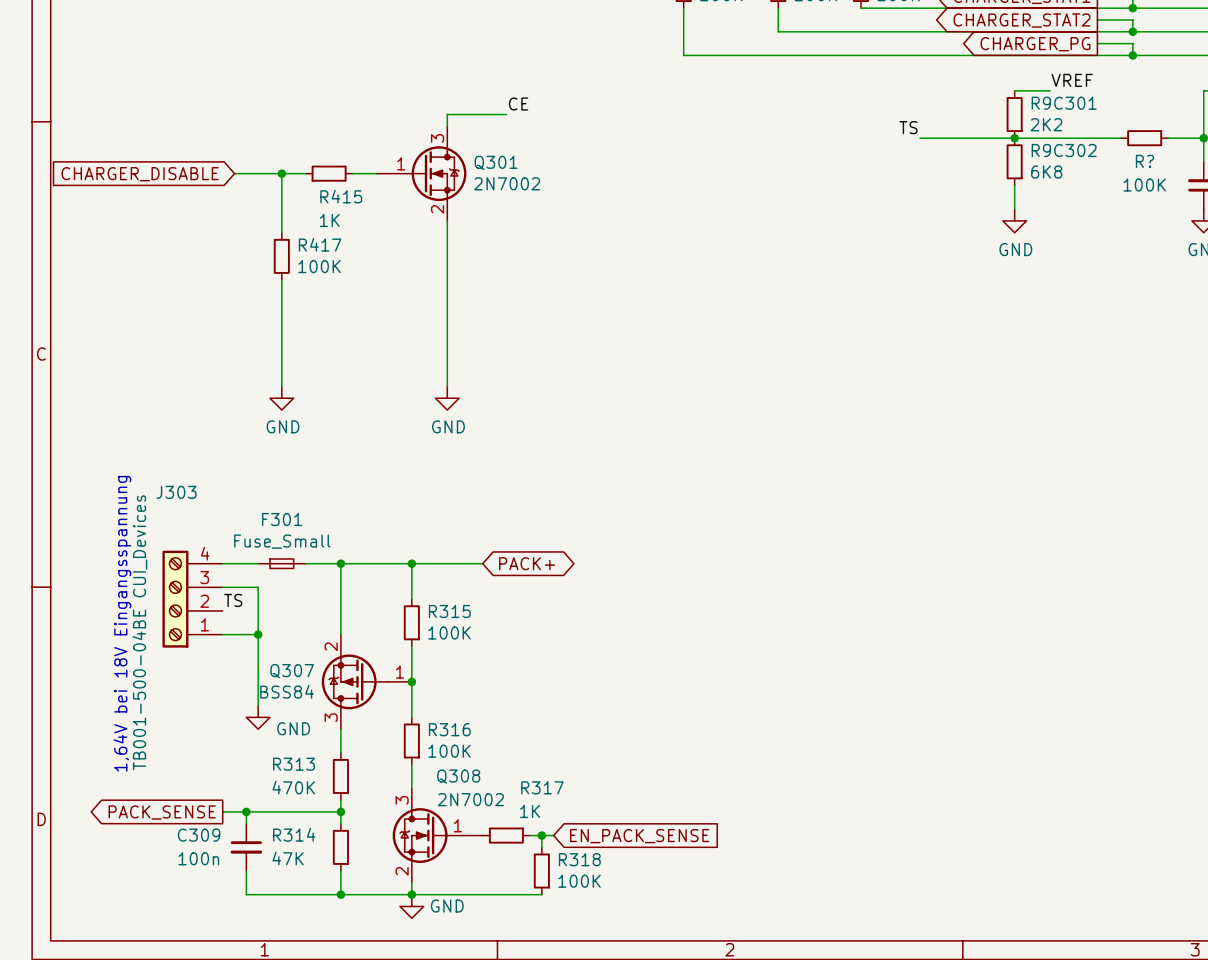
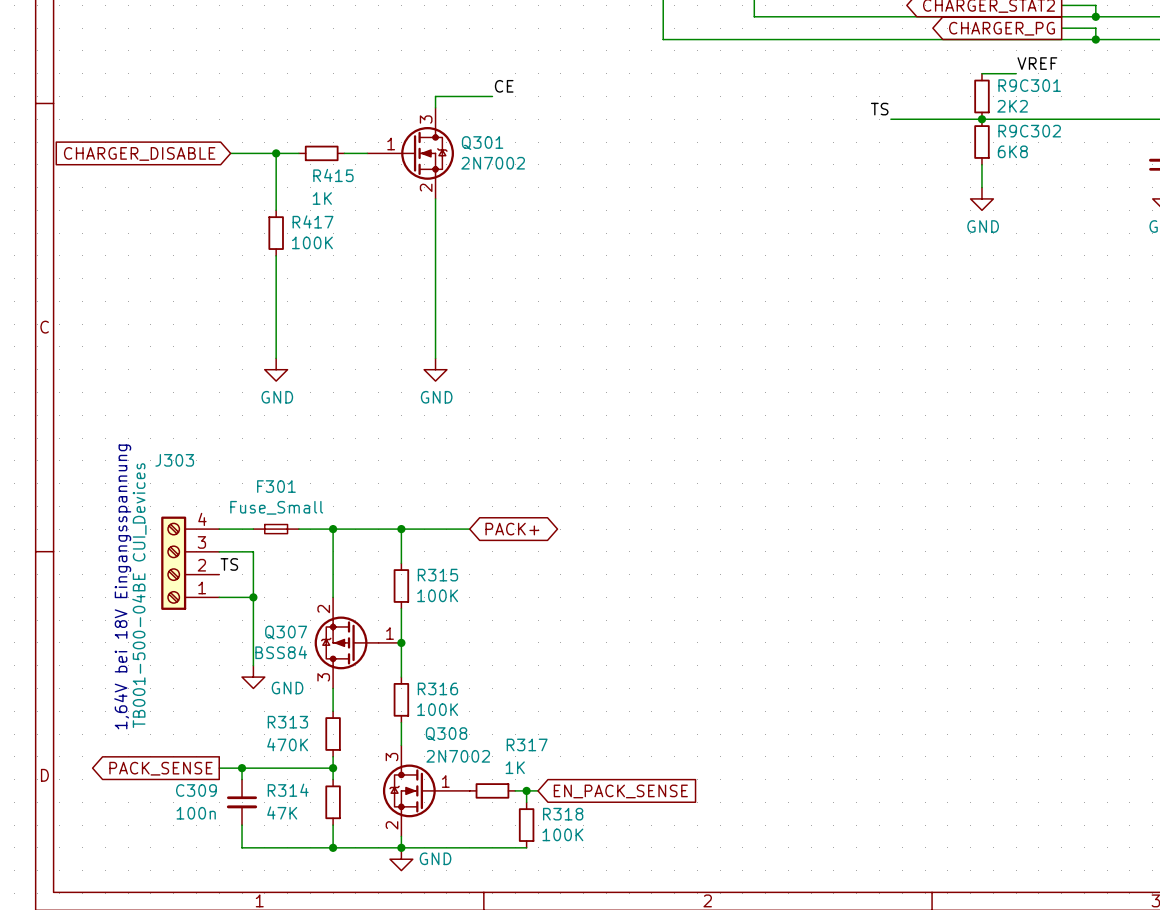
wire: none -> (1084, 119) (1129, 119)
R?: 100K (1144, 138) -> none

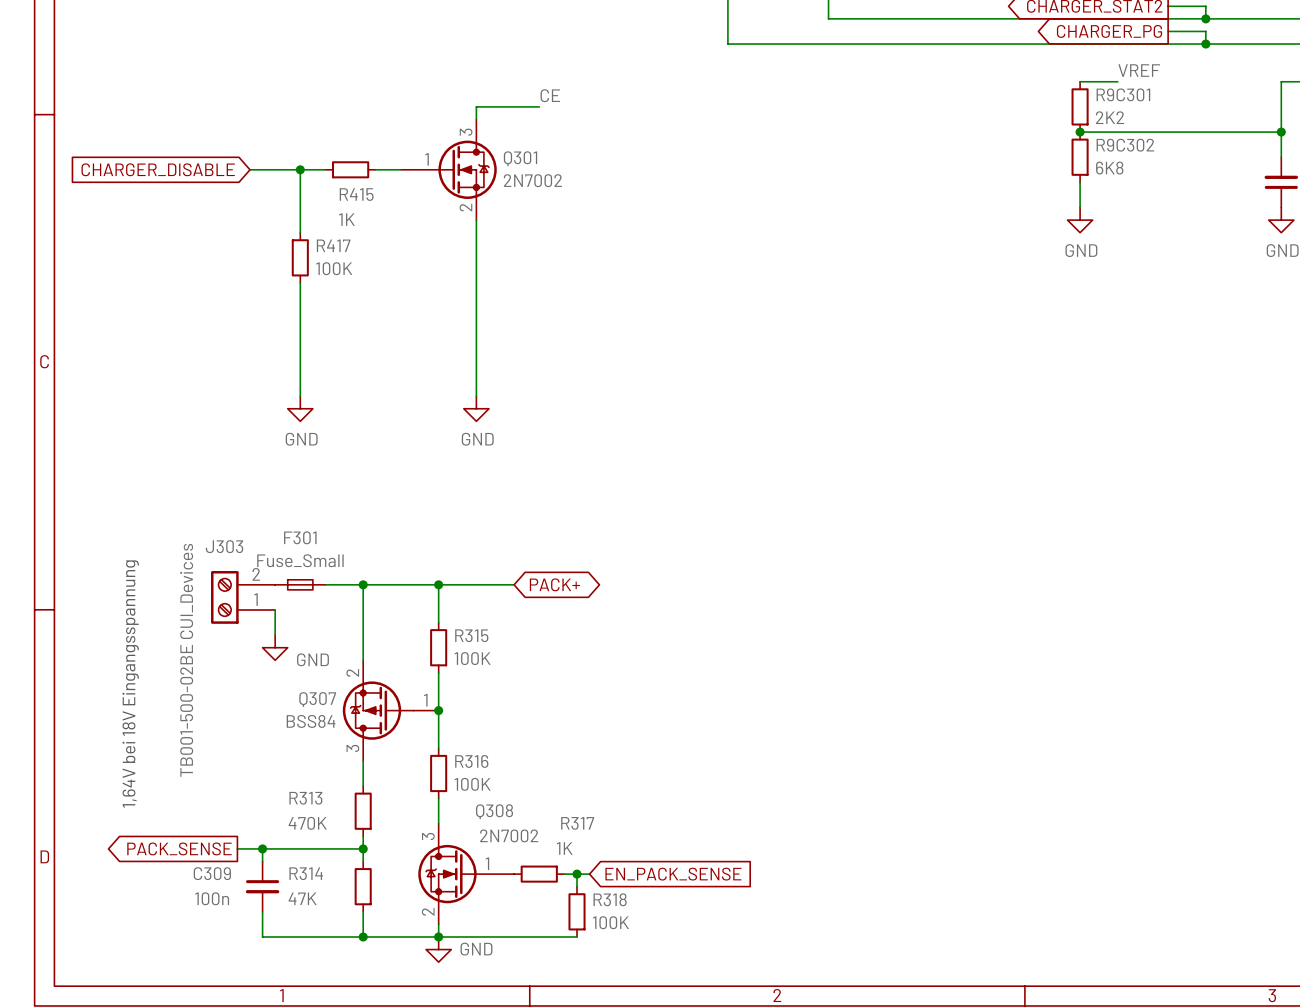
label: TS (879, 109) -> none
wire: (890, 119) (981, 119) -> none
J303 name position: J303 (174, 460) -> J303 (224, 546)
J303 symbol: [161, 516, 220, 610] -> [211, 571, 276, 624]
label: TS (229, 564) -> none
wire: (253, 574) (253, 665) -> none
J303 value: TB001-500-04BE CUI_Devices (139, 595) -> TB001-500-02BE CUI_Devices (186, 660)
wire: (219, 597) (253, 597) -> none
junction: (253, 597) -> none
power symbol position: GND (253, 677) -> GND (275, 647)

